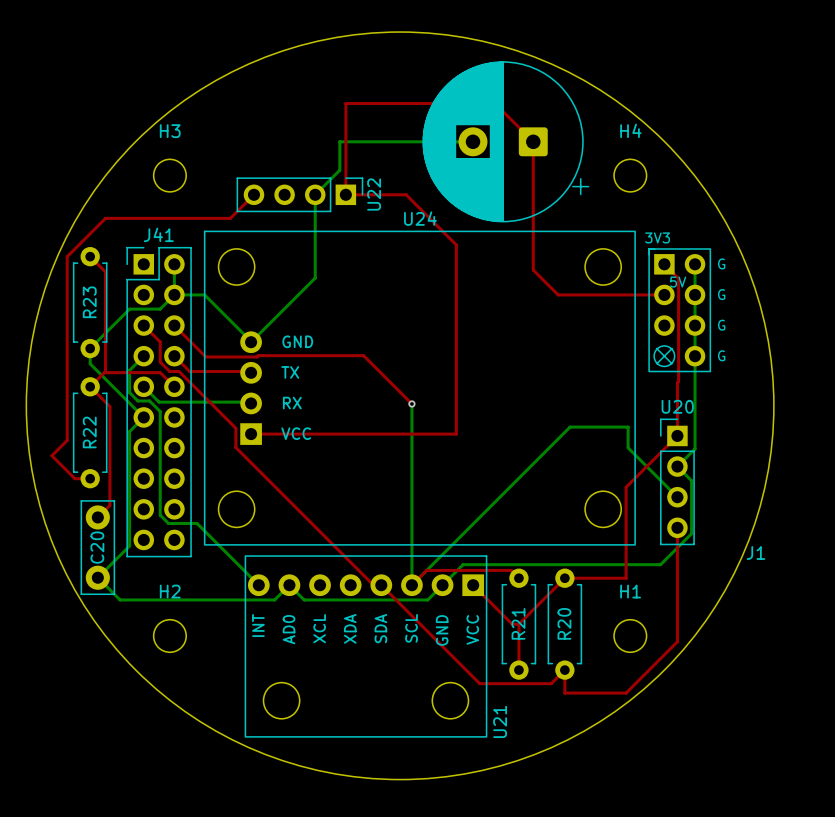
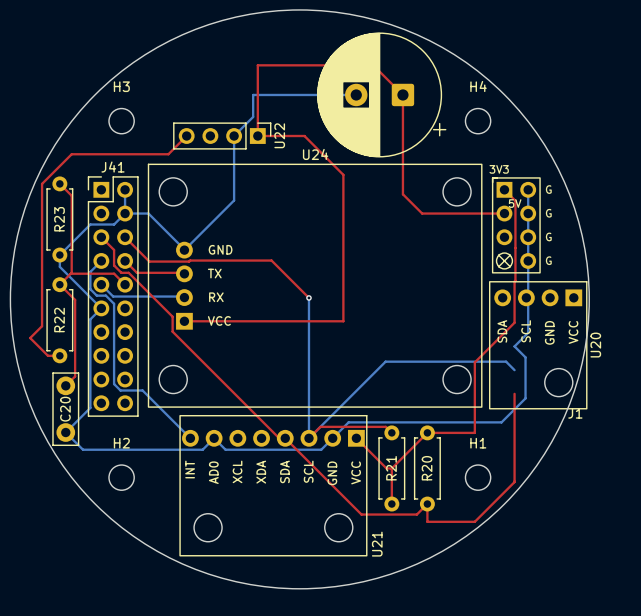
U20 name position: U20 (677, 406) -> U20 (595, 345)
U20 footprint: [660, 418, 695, 546] -> [489, 281, 588, 410]
bottom track: (510, 486) (570, 427) (628, 427) (628, 447) (666, 486) -> (385, 361) (506, 361)

